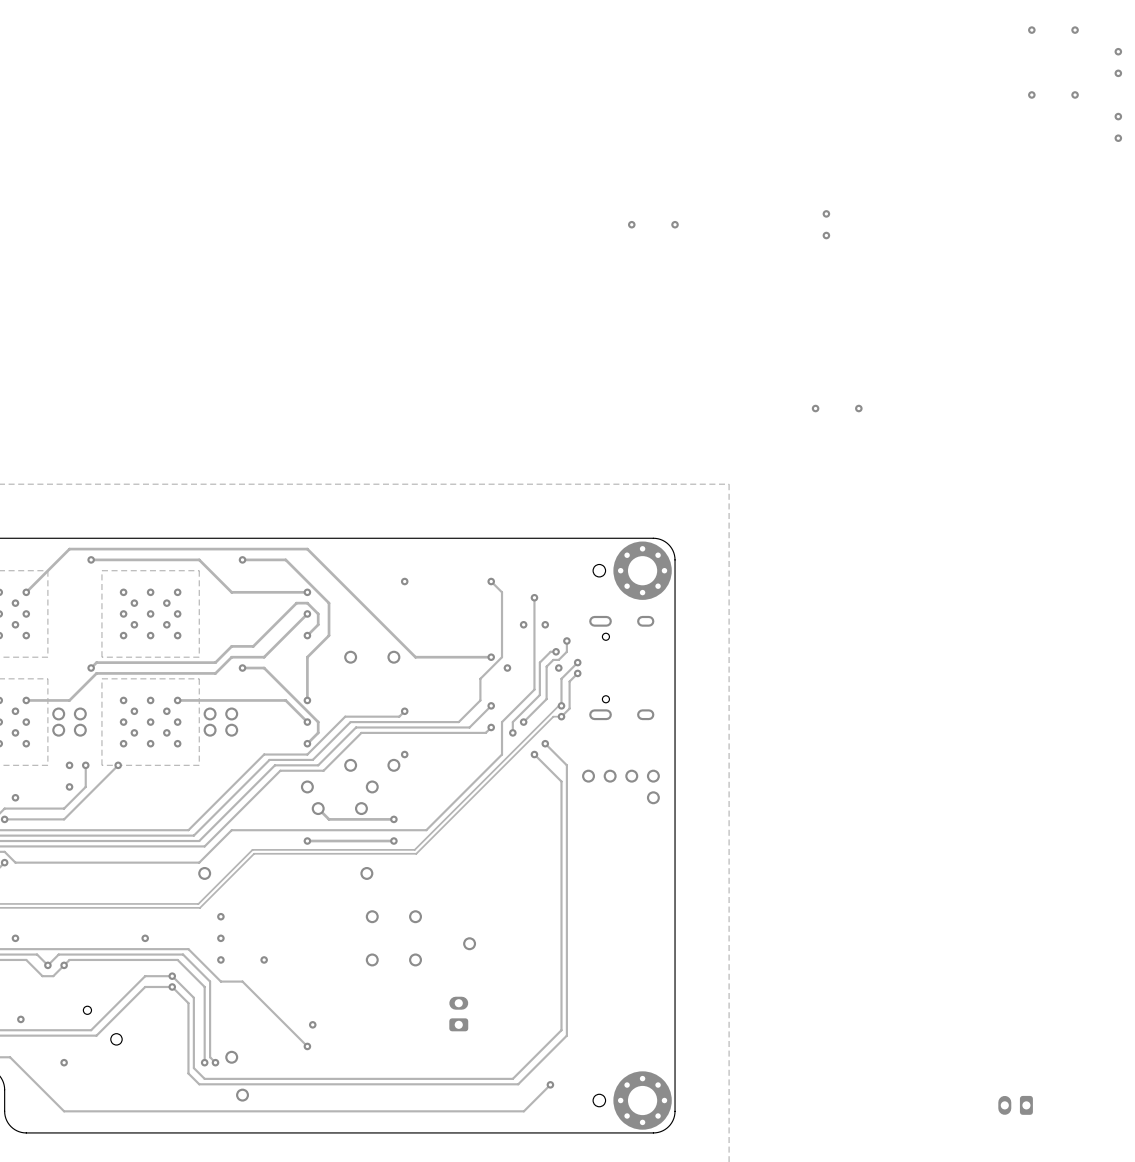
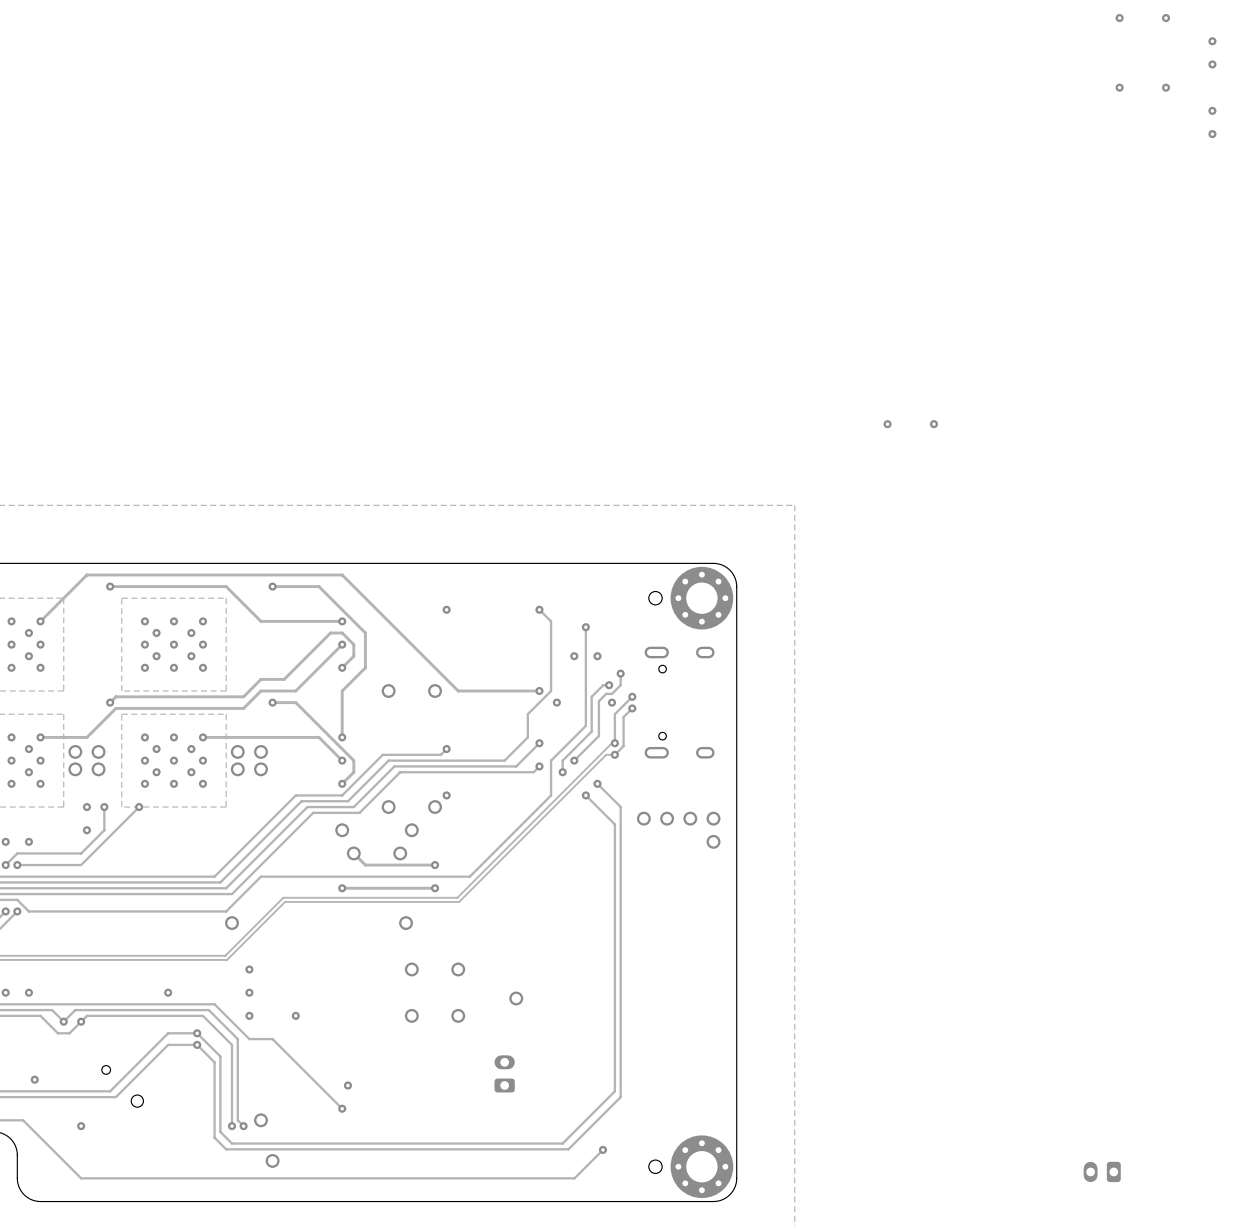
via: (826, 213) -> none
via: (631, 224) -> none
via: (675, 224) -> none
via: (826, 235) -> none

